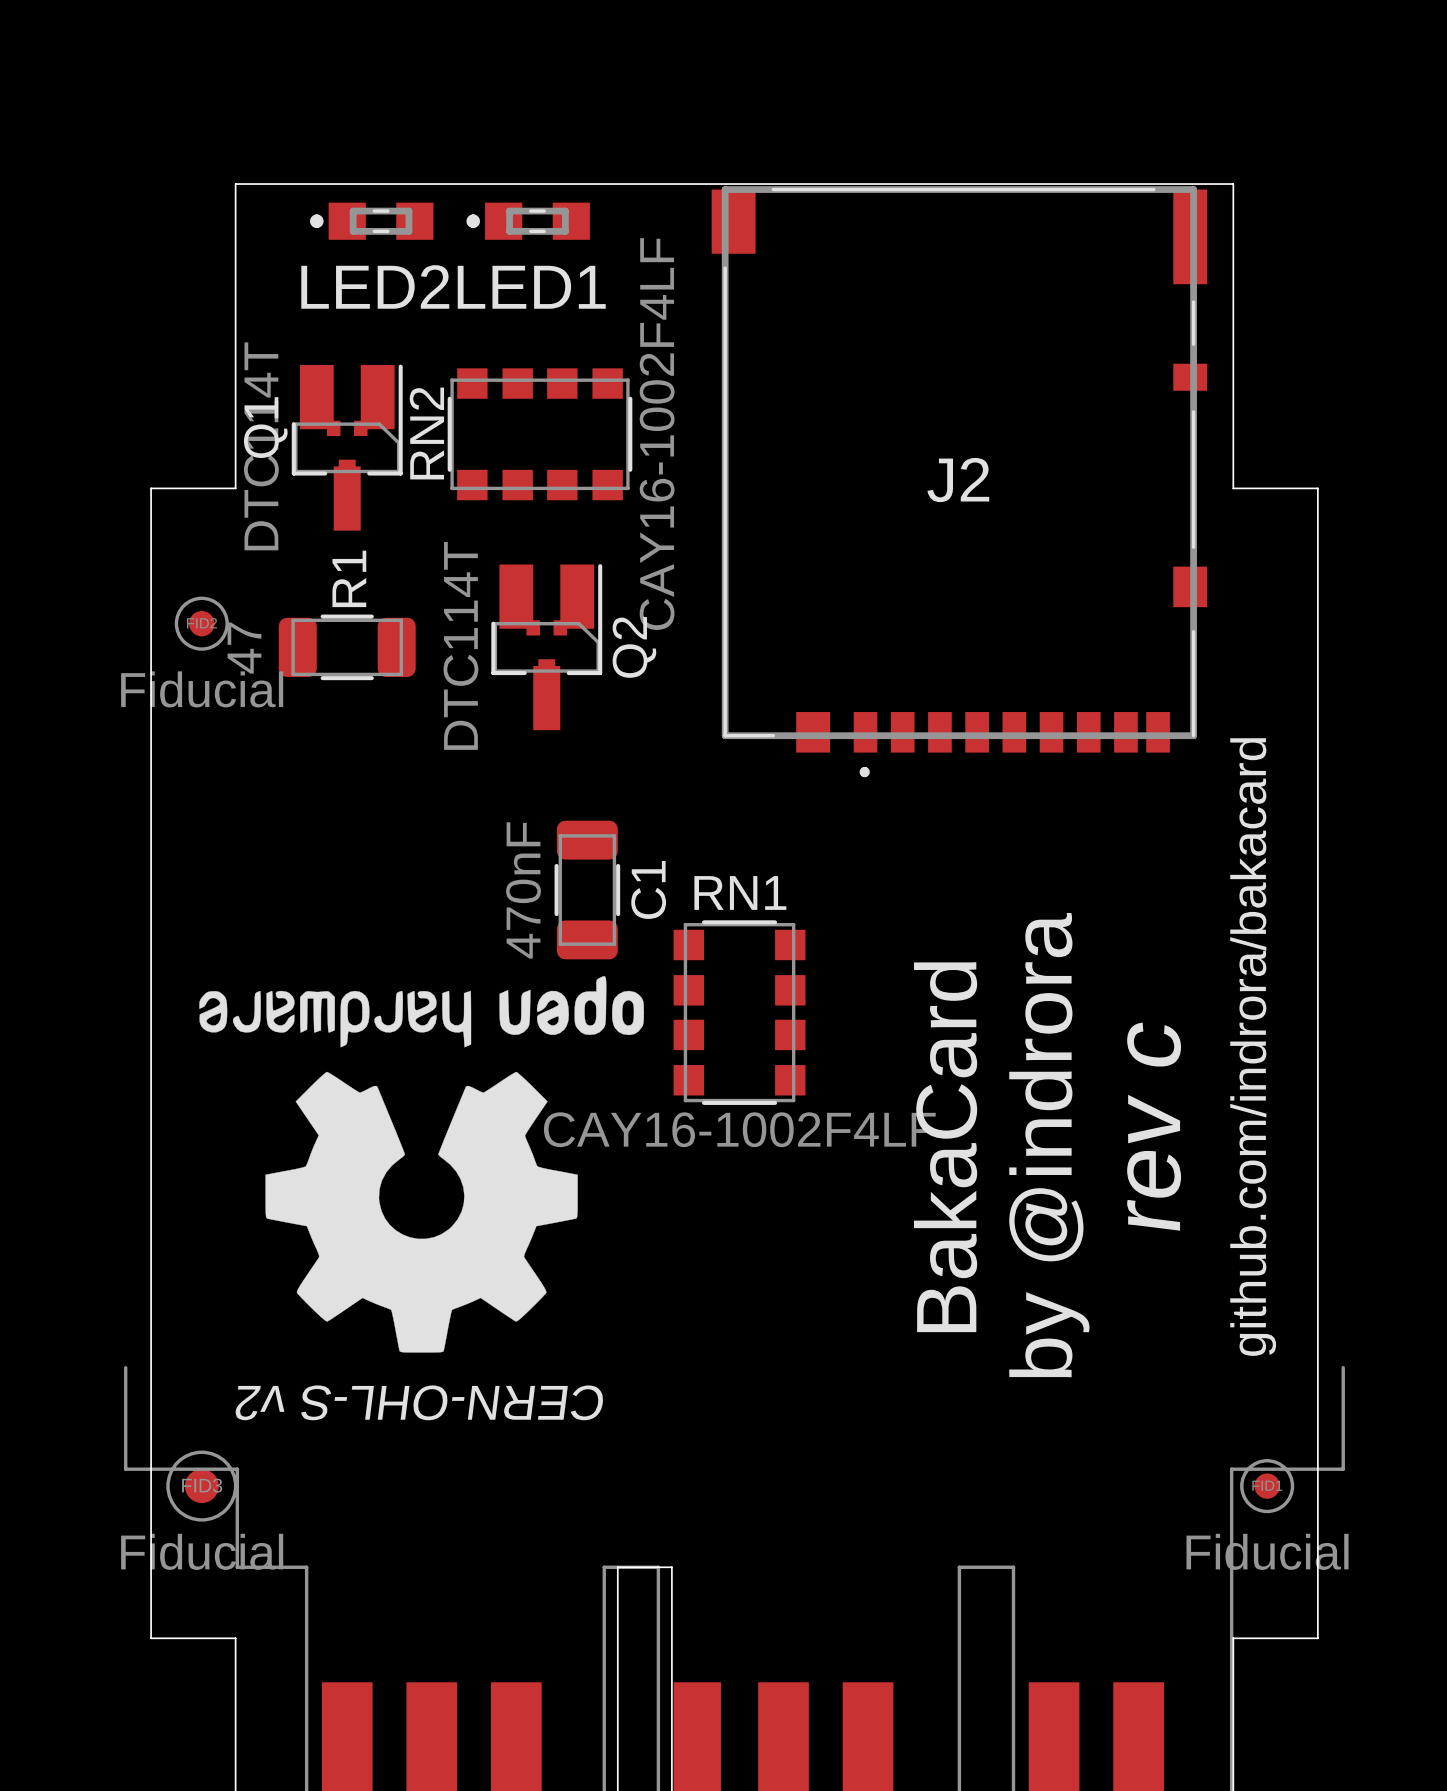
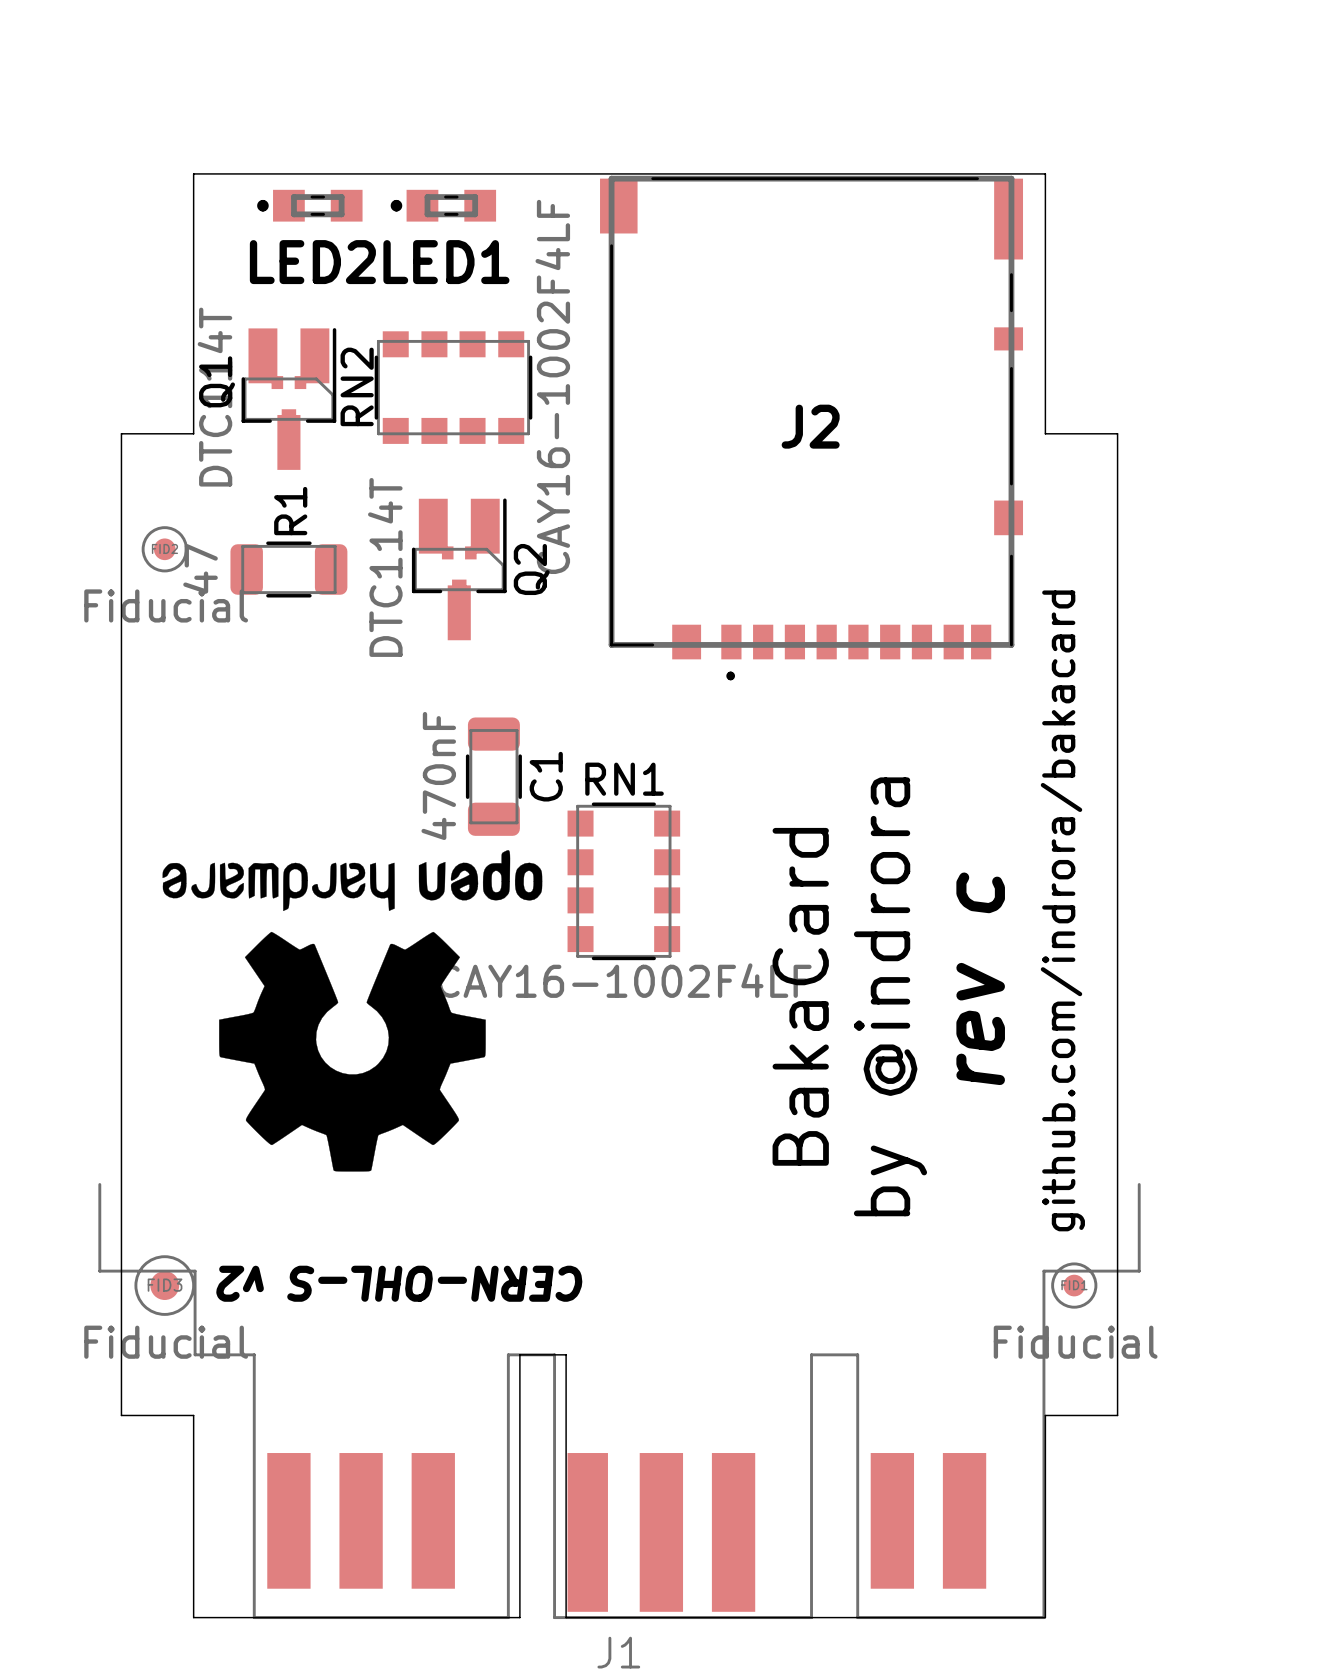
text position: CERN-OHL-S v2 (419, 1402) -> CERN-OHL-S v2 (399, 1283)

